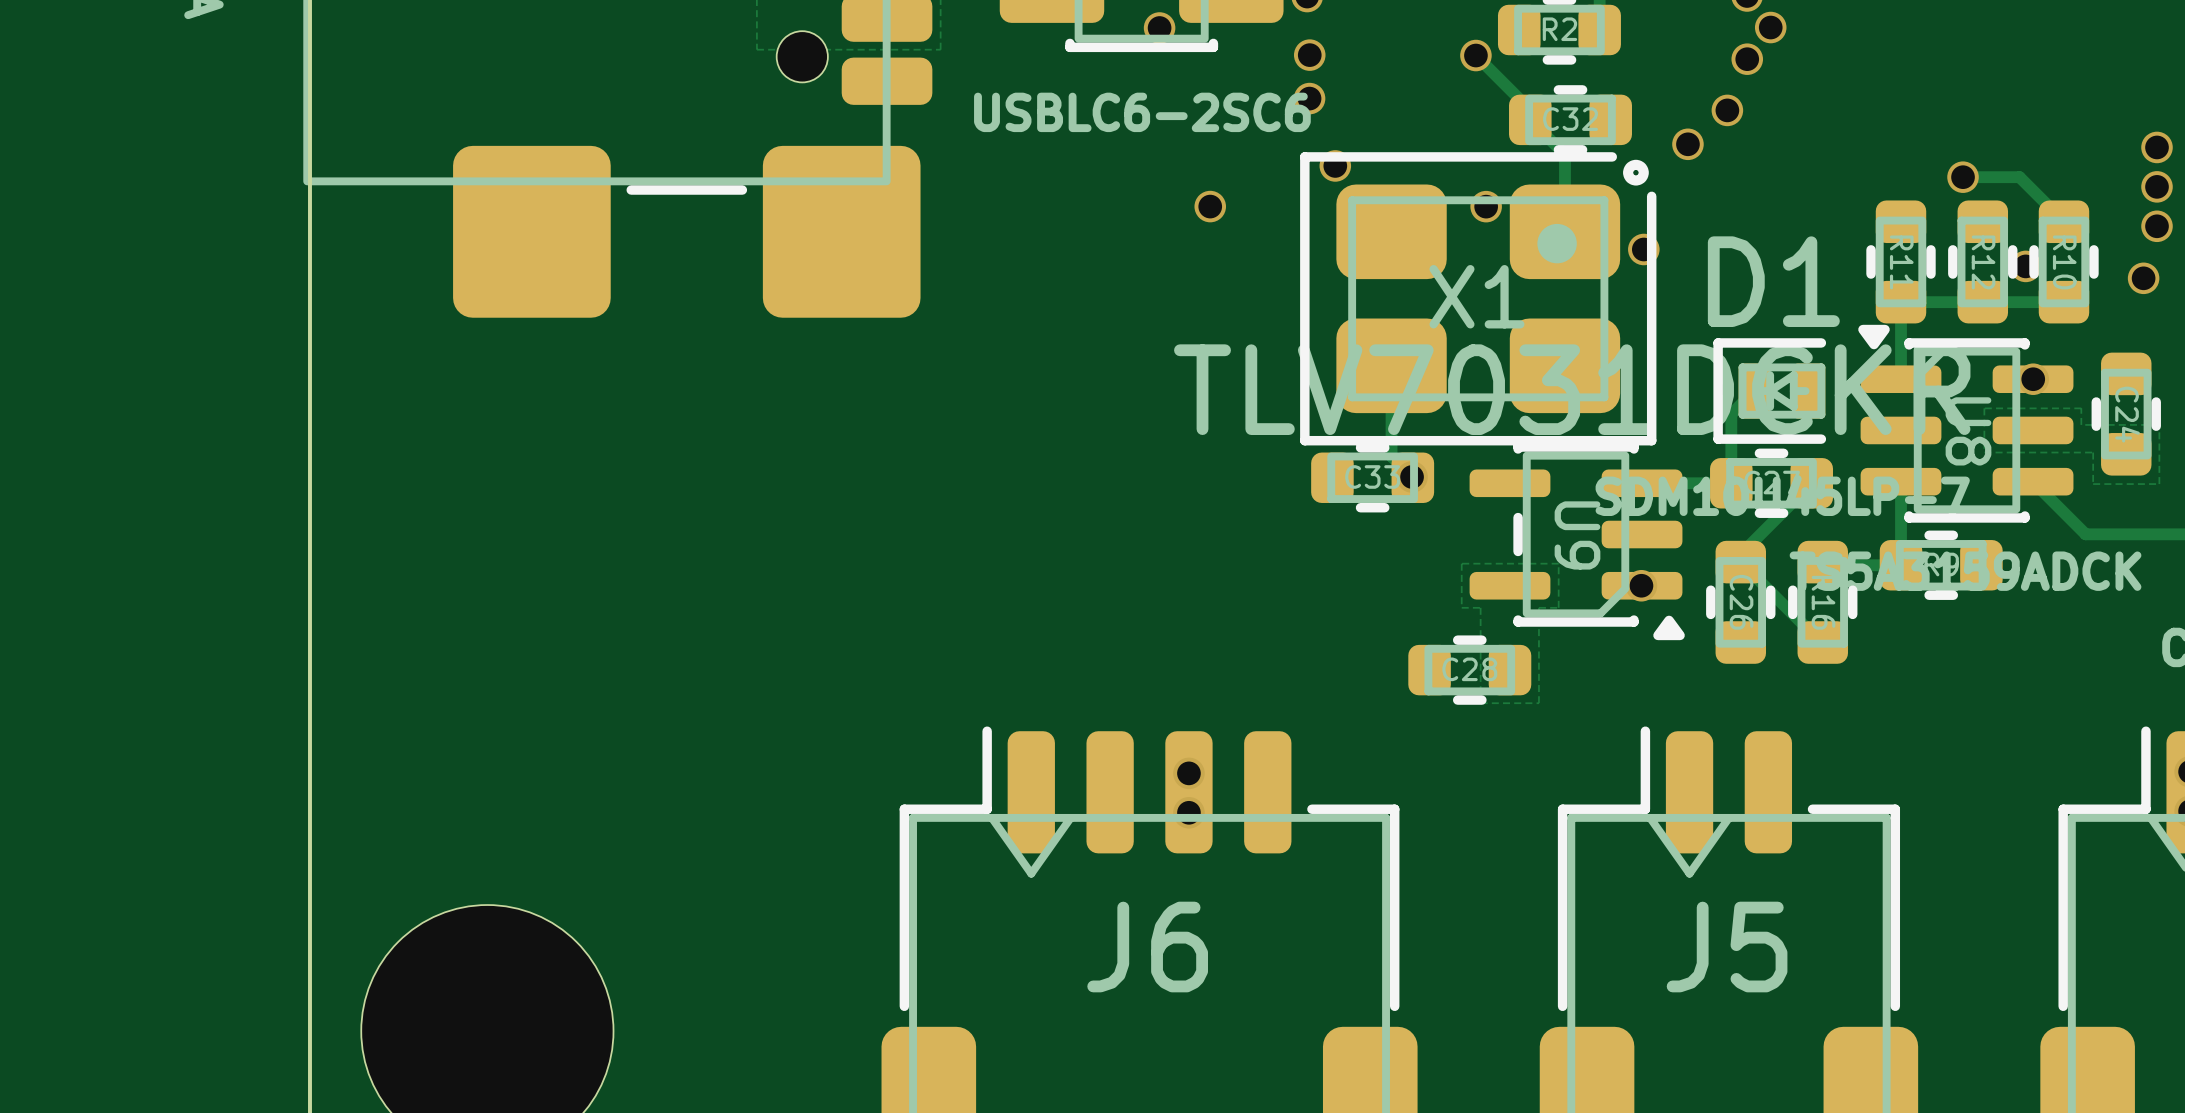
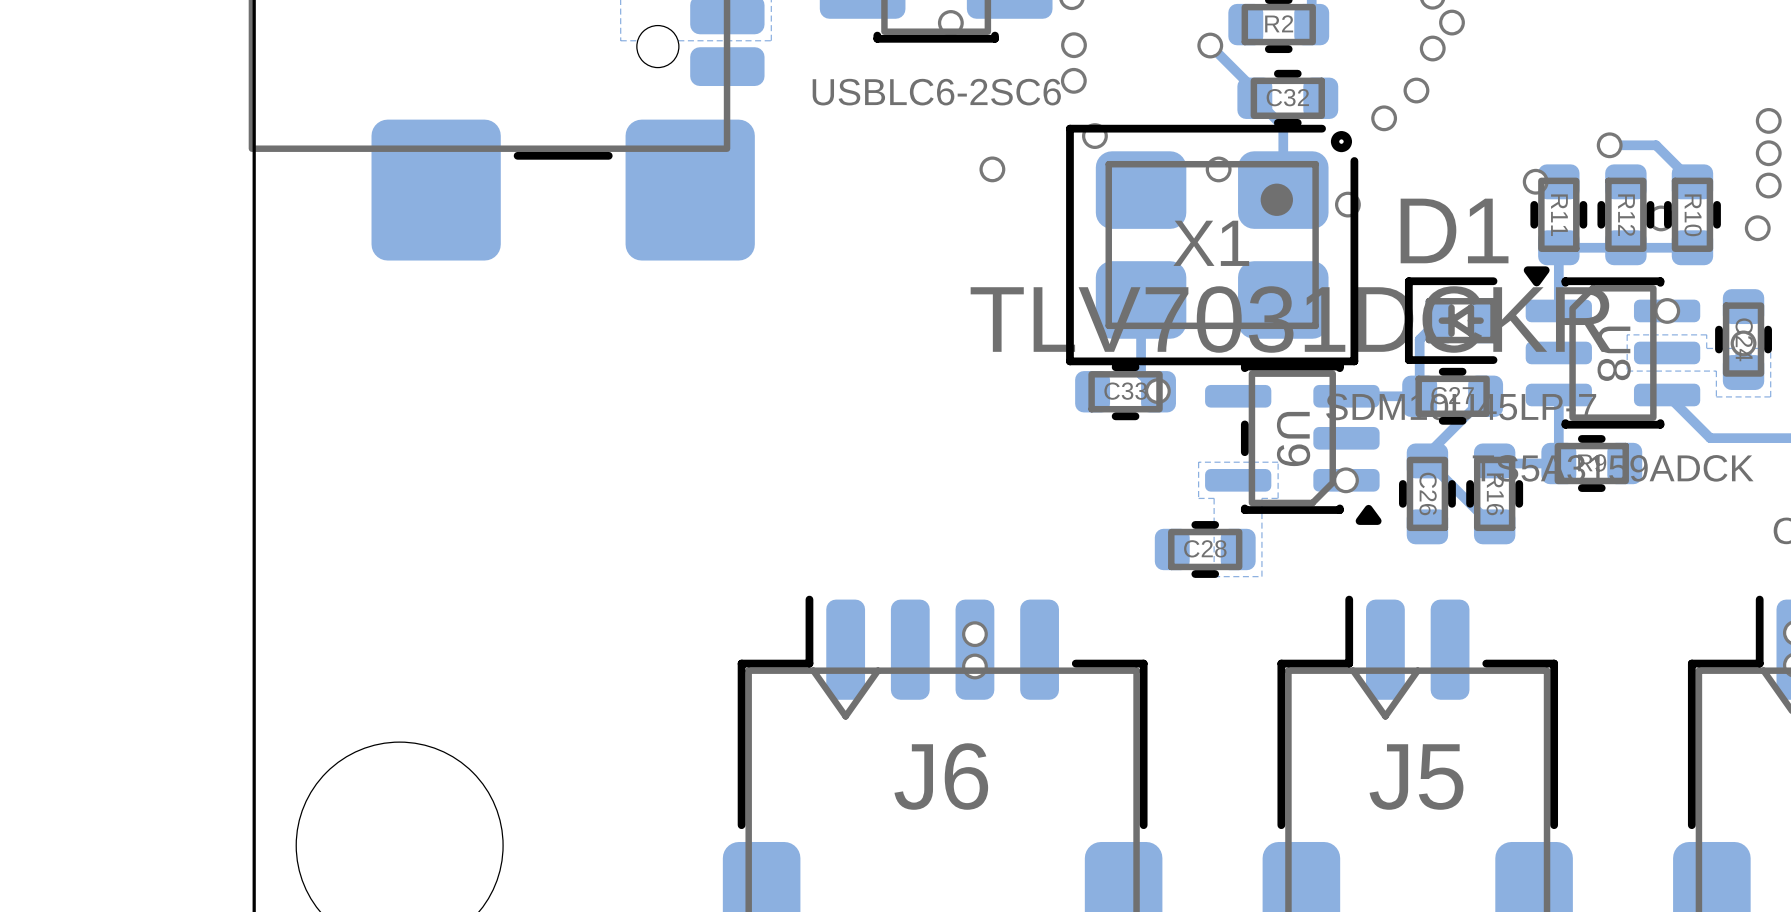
via: none -> (1535, 181)
via: none -> (1743, 343)

